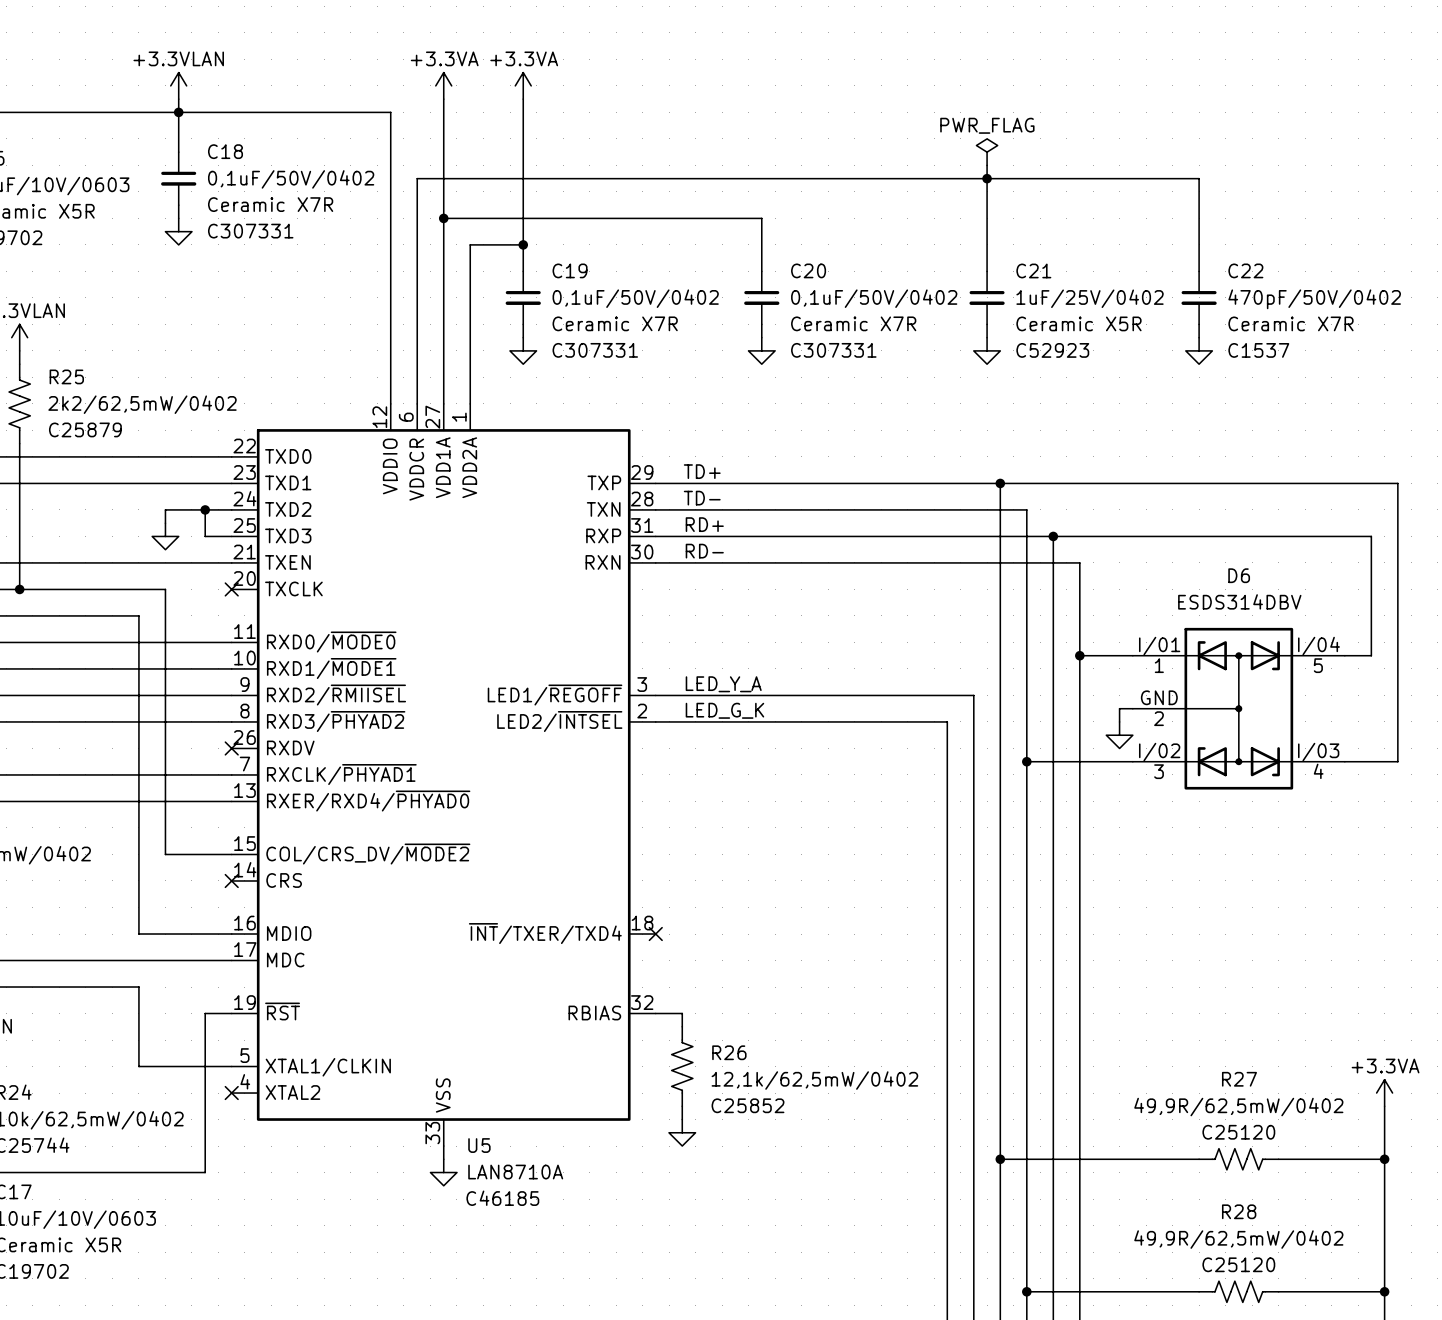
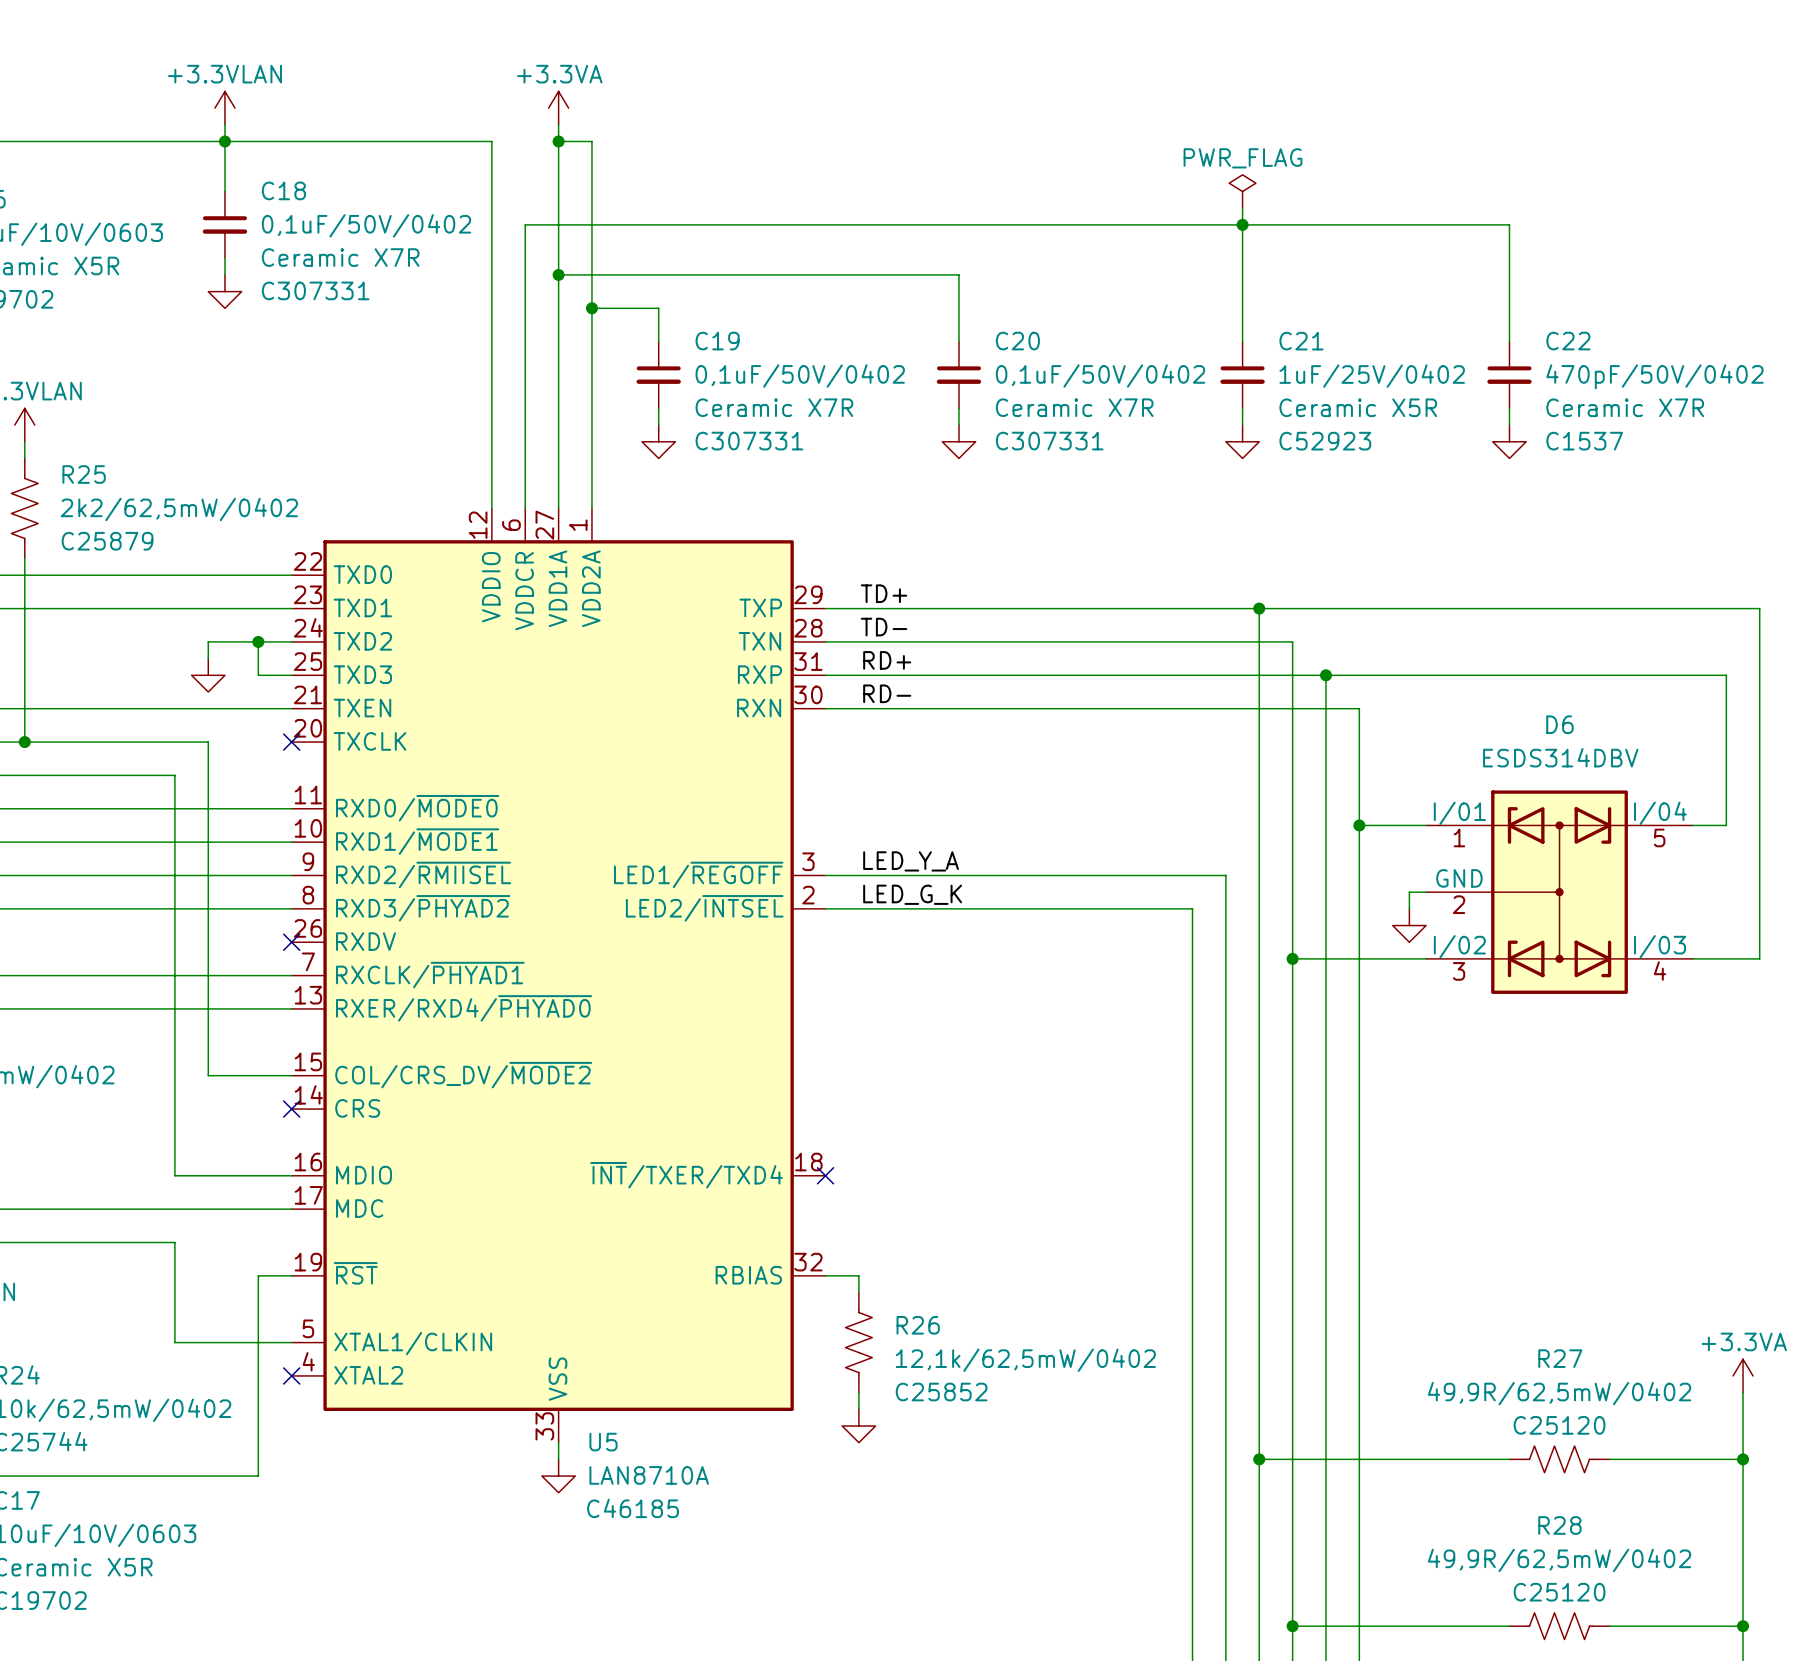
power symbol: +3.3VA (523, 85) -> none
wire: (523, 99) (523, 244) -> none
wire: none -> (558, 141) (591, 141) (591, 308)
junction: none -> (558, 141)
junction position: (523, 244) -> (591, 308)

